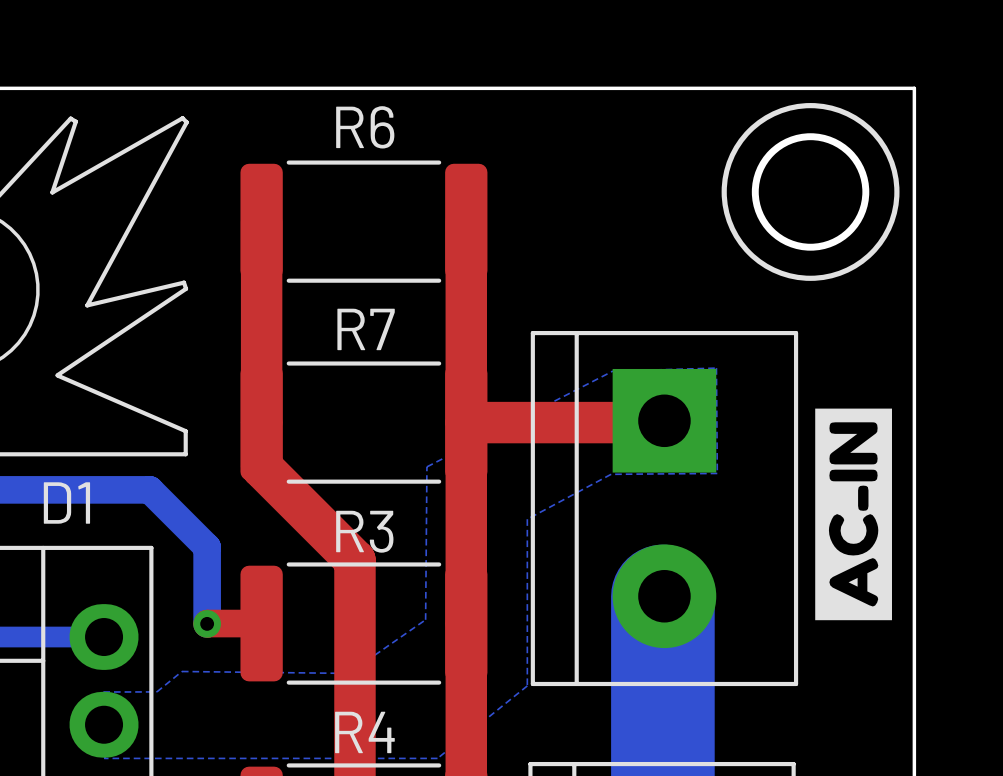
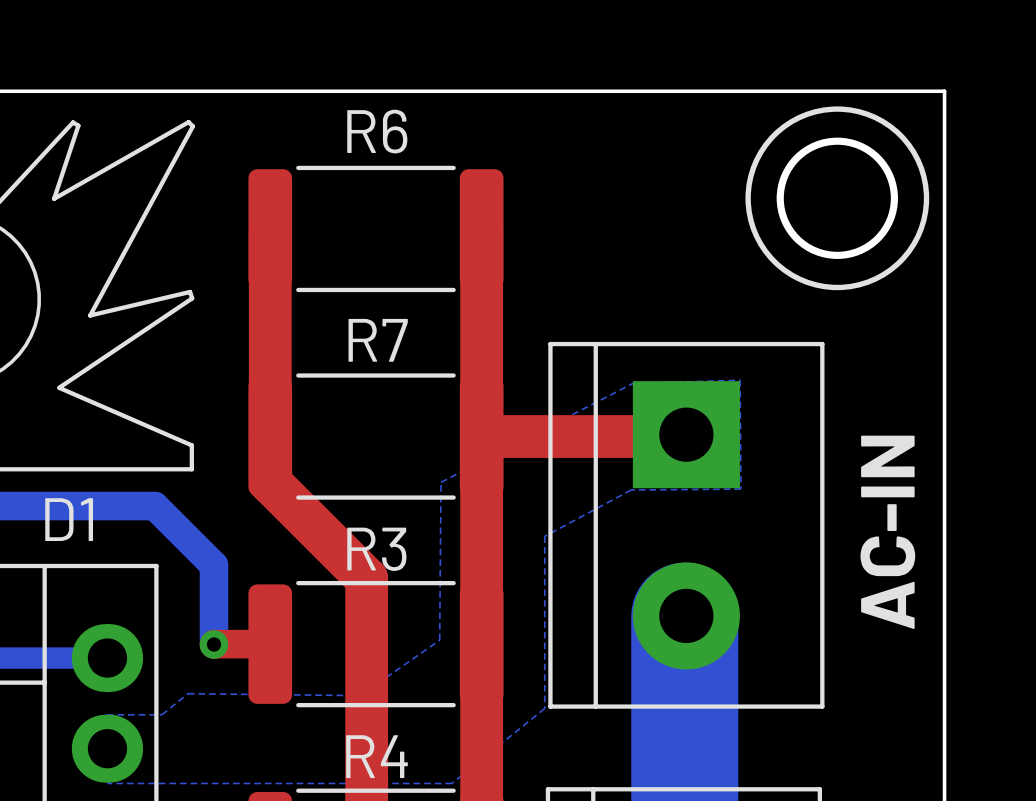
drawing: [815, 408, 892, 621] -> none
text: none -> AC-IN (887, 532)

